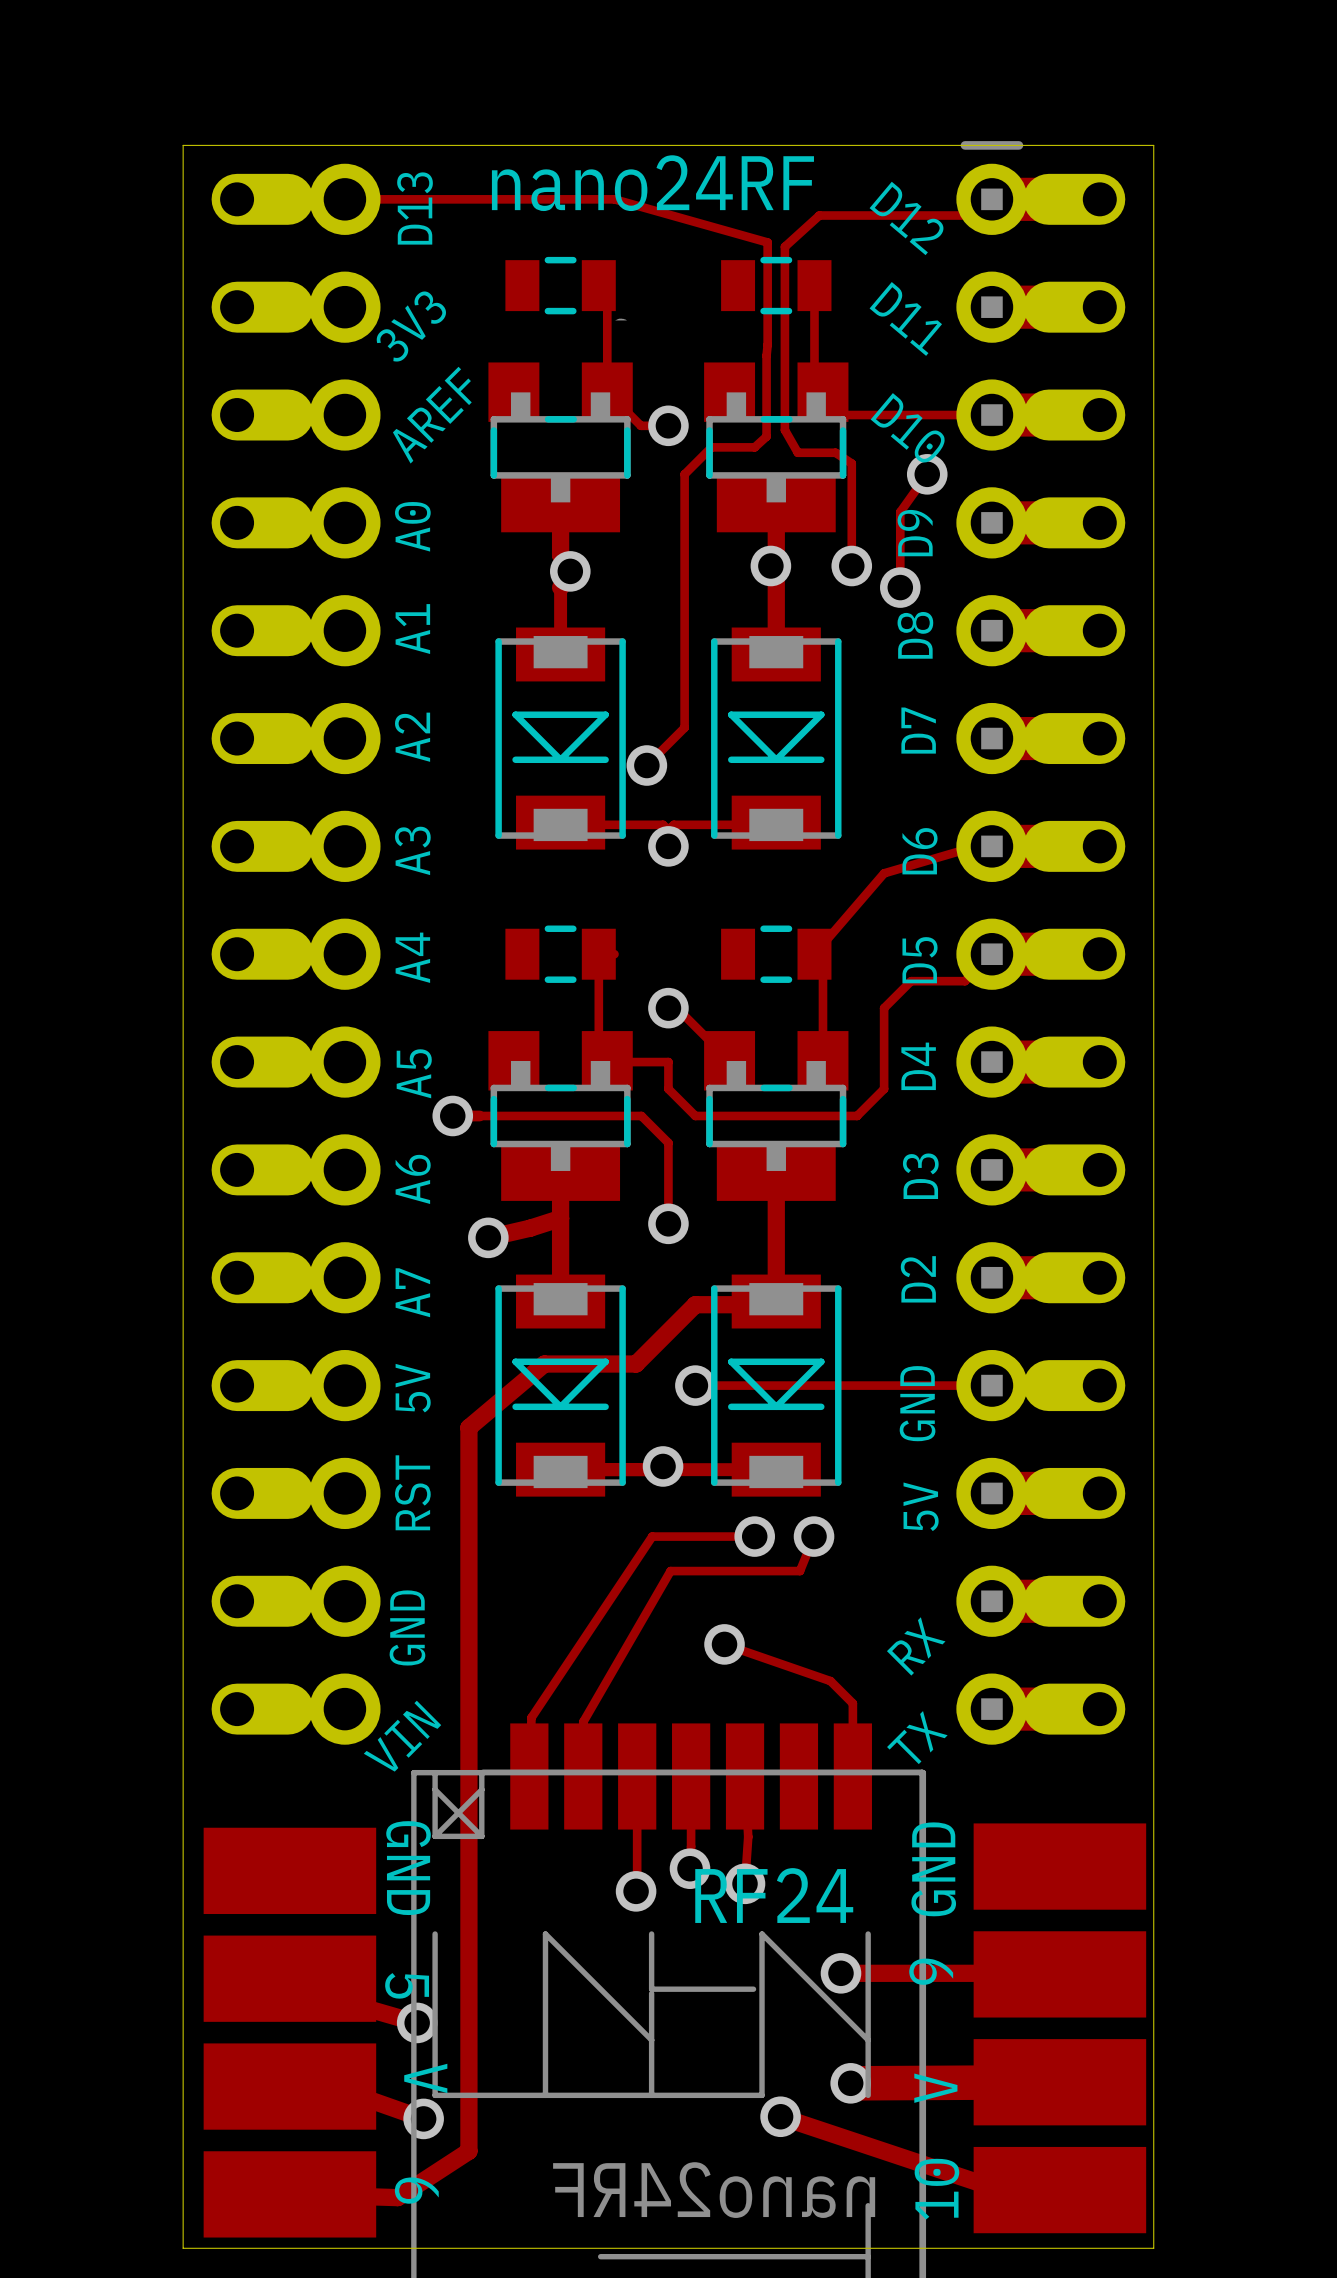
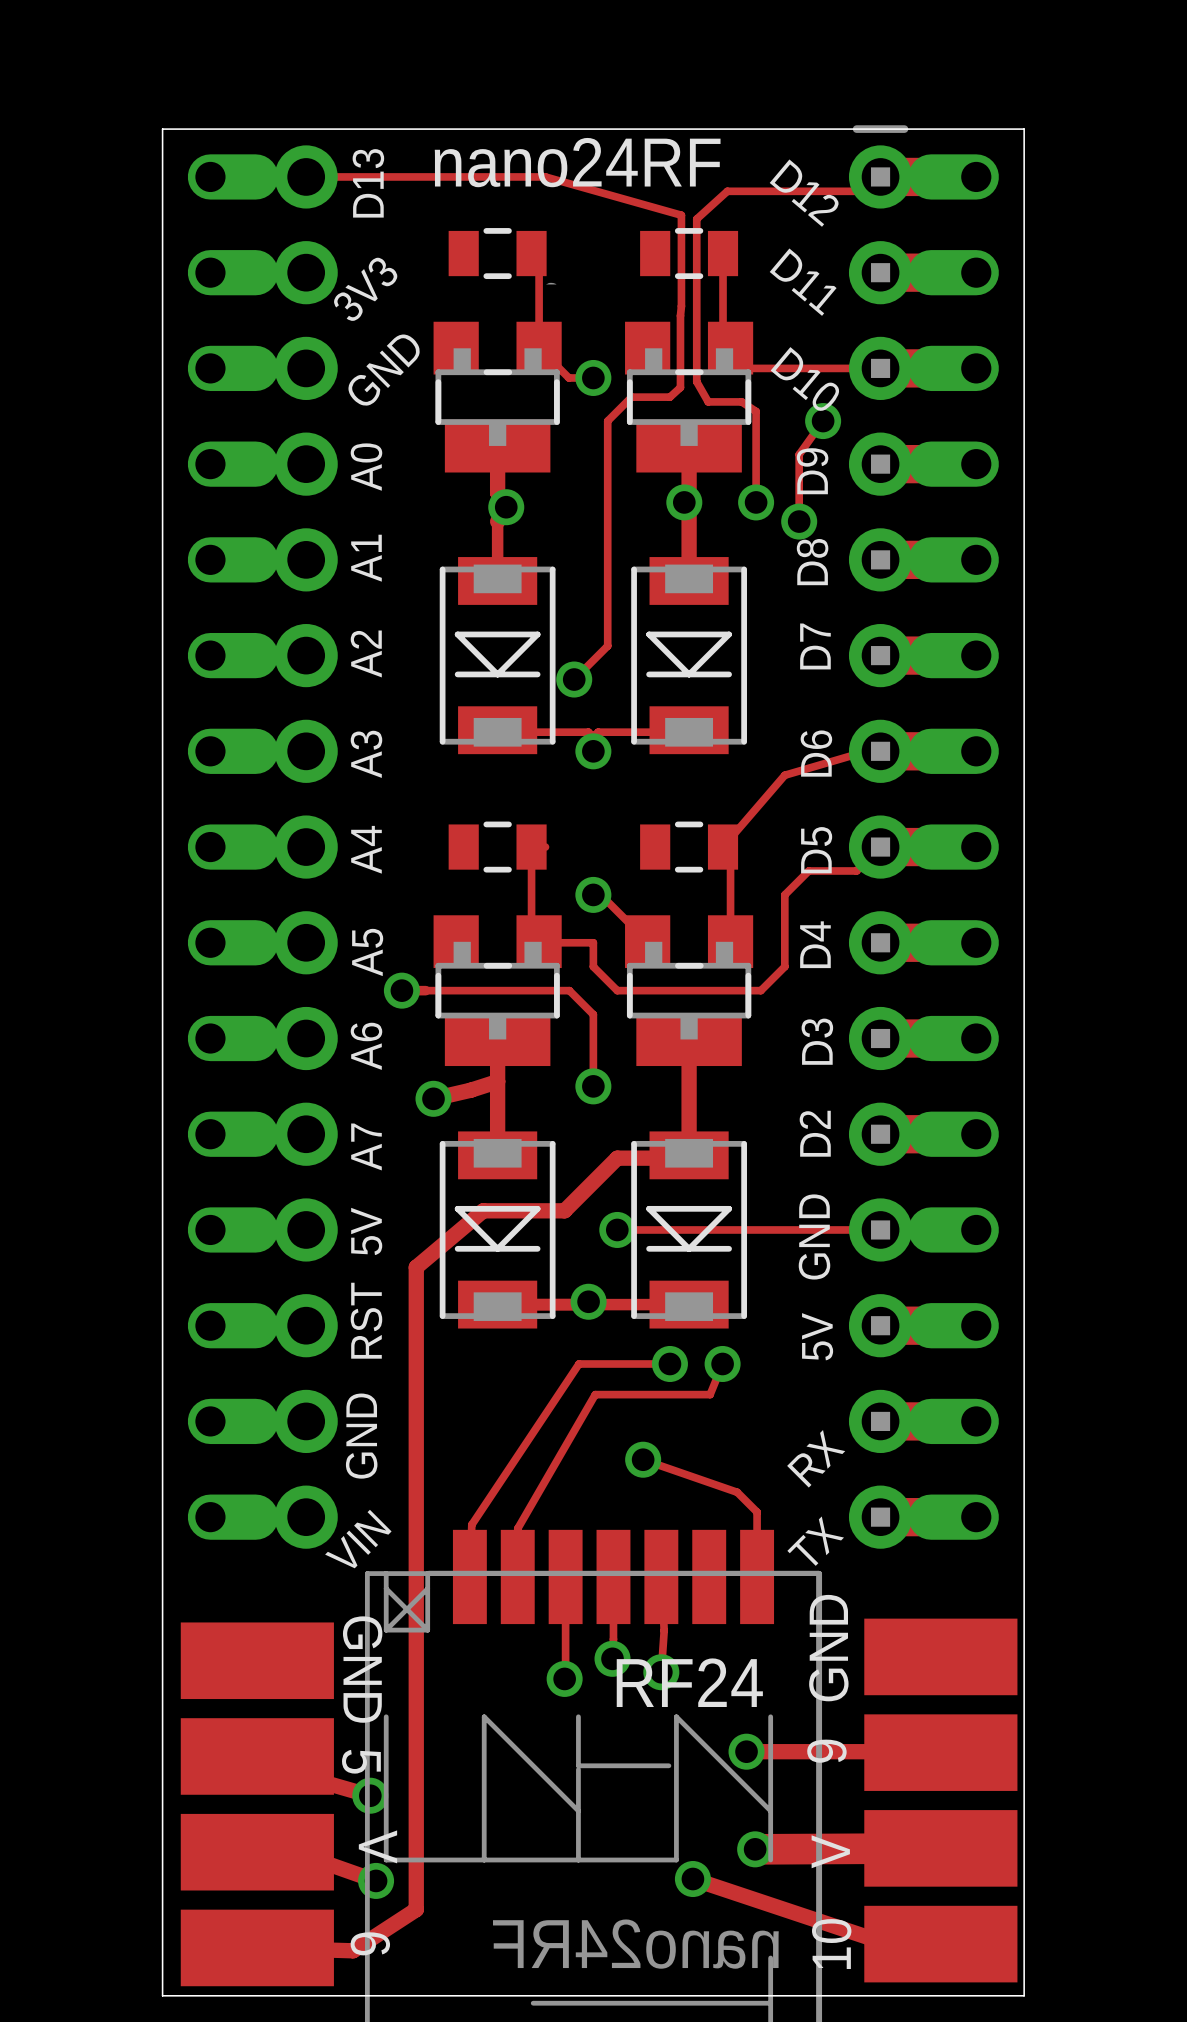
text: AREF (432, 415) -> GND (384, 370)

